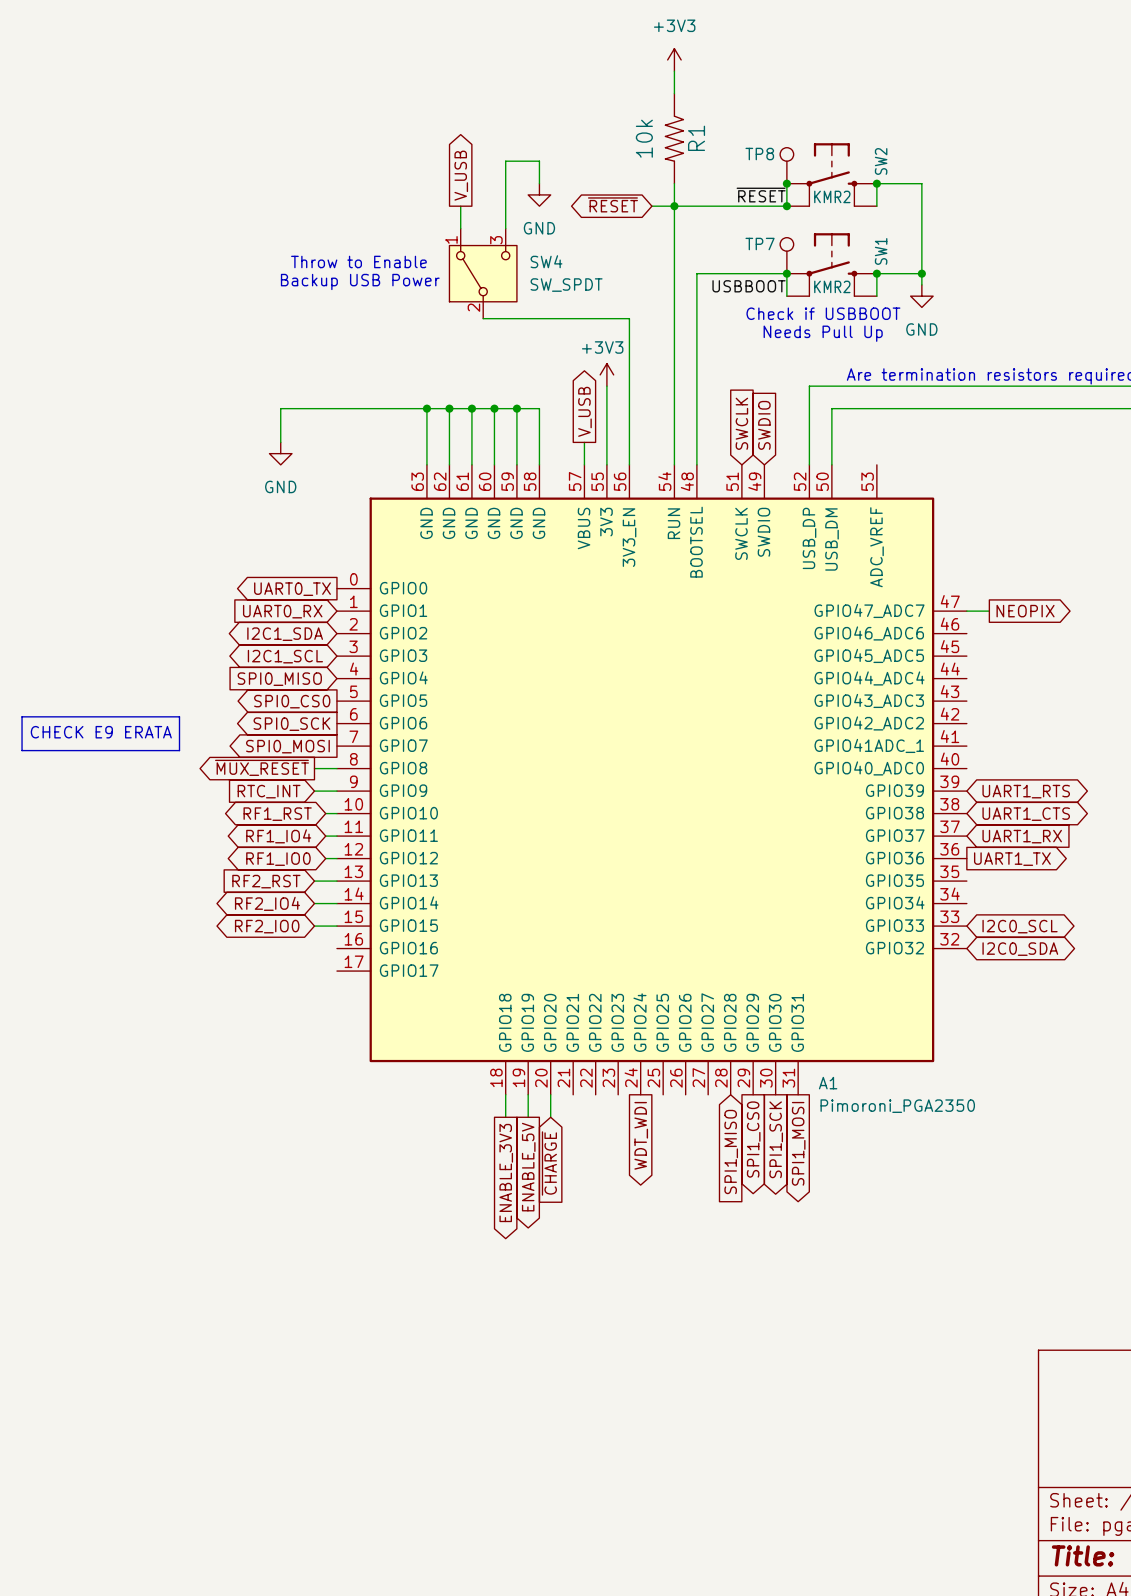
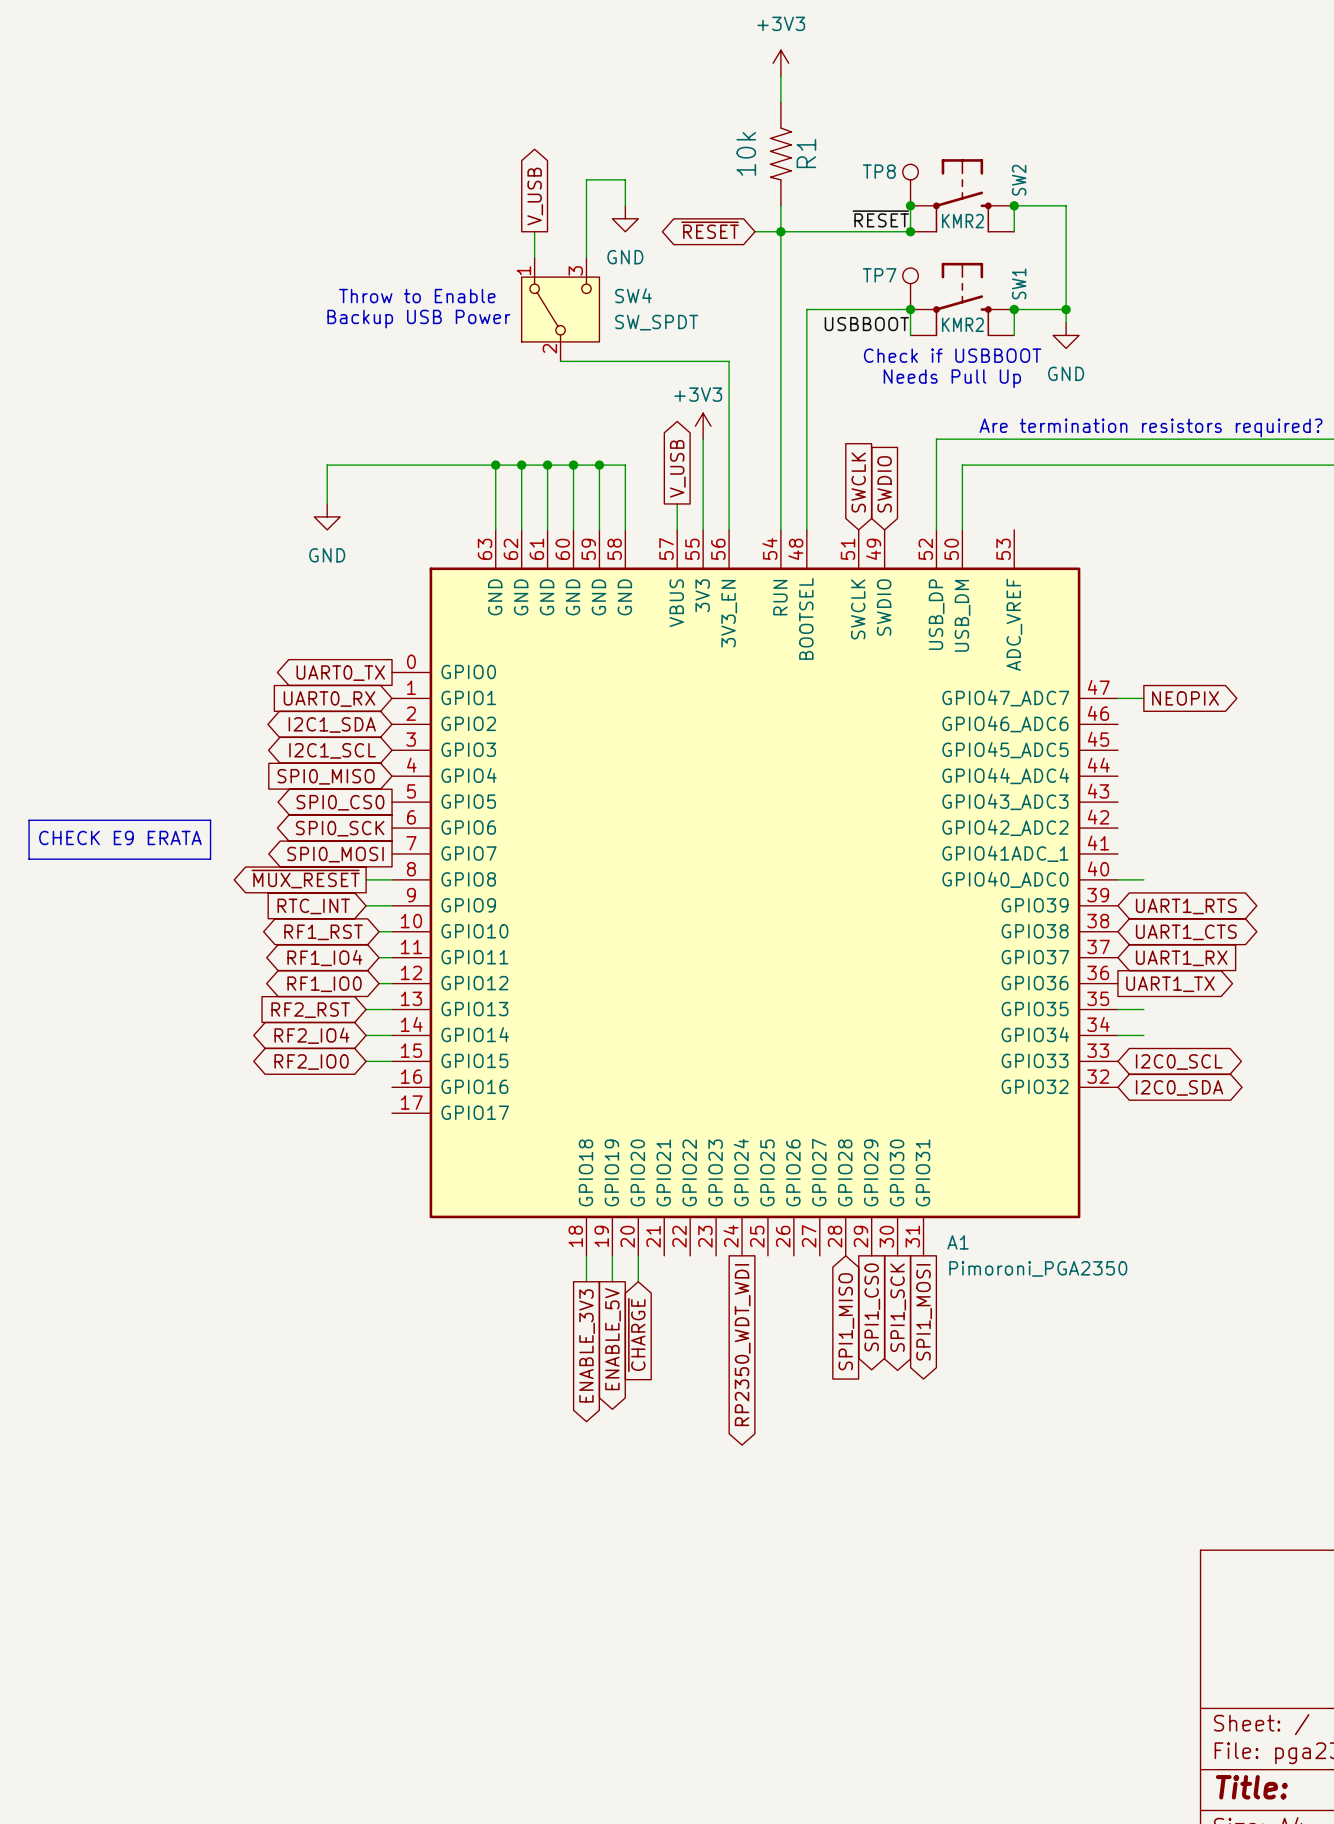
wire: none -> (1117, 879) (1143, 879)
wire: none -> (1117, 1009) (1143, 1009)
wire: none -> (1117, 1035) (1143, 1035)
global label: WDT_WDI (641, 1135) -> RP2350_WDT_WDI (742, 1345)

